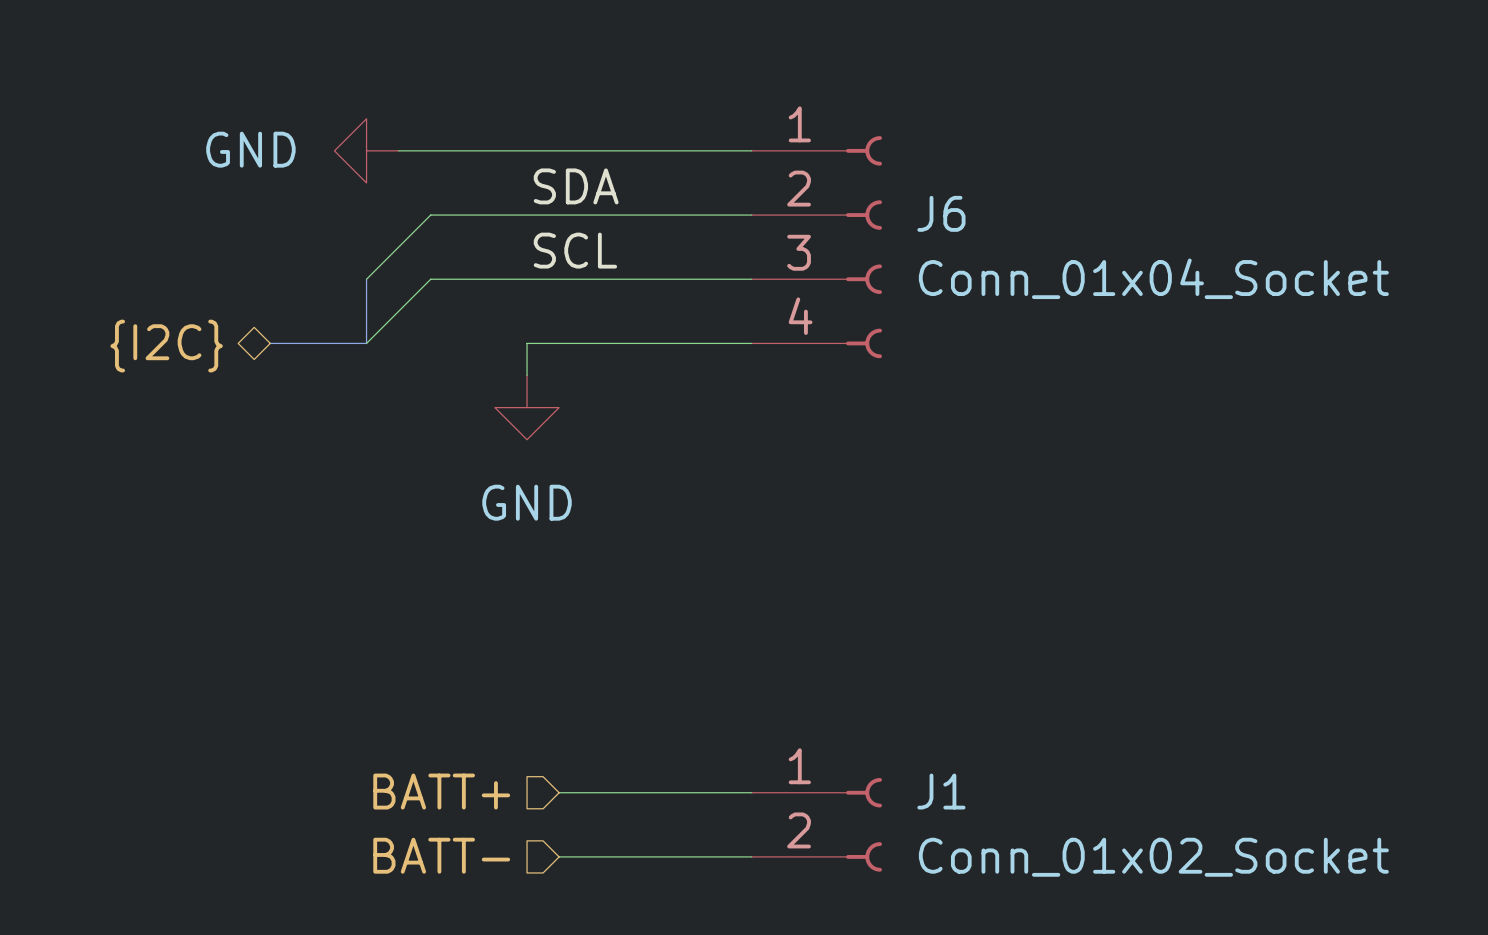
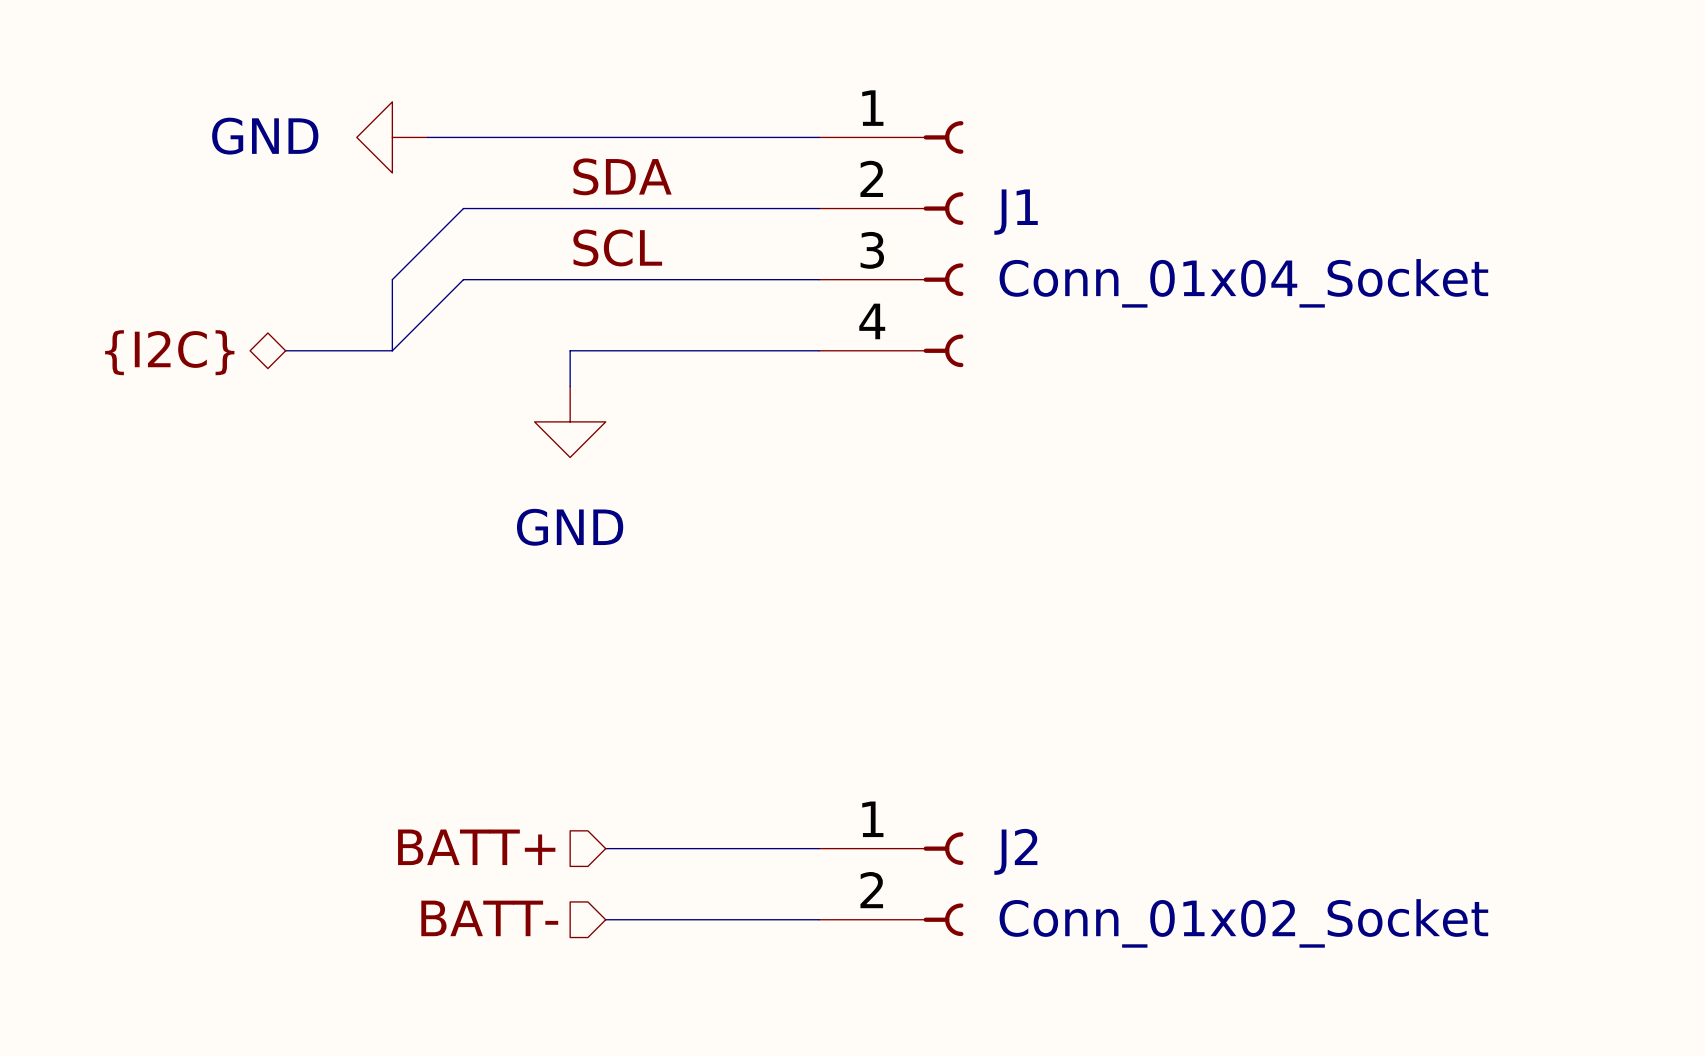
J6 name: J6 (941, 213) -> J1 (1016, 212)
J1 name: J1 (941, 791) -> J2 (1015, 851)

